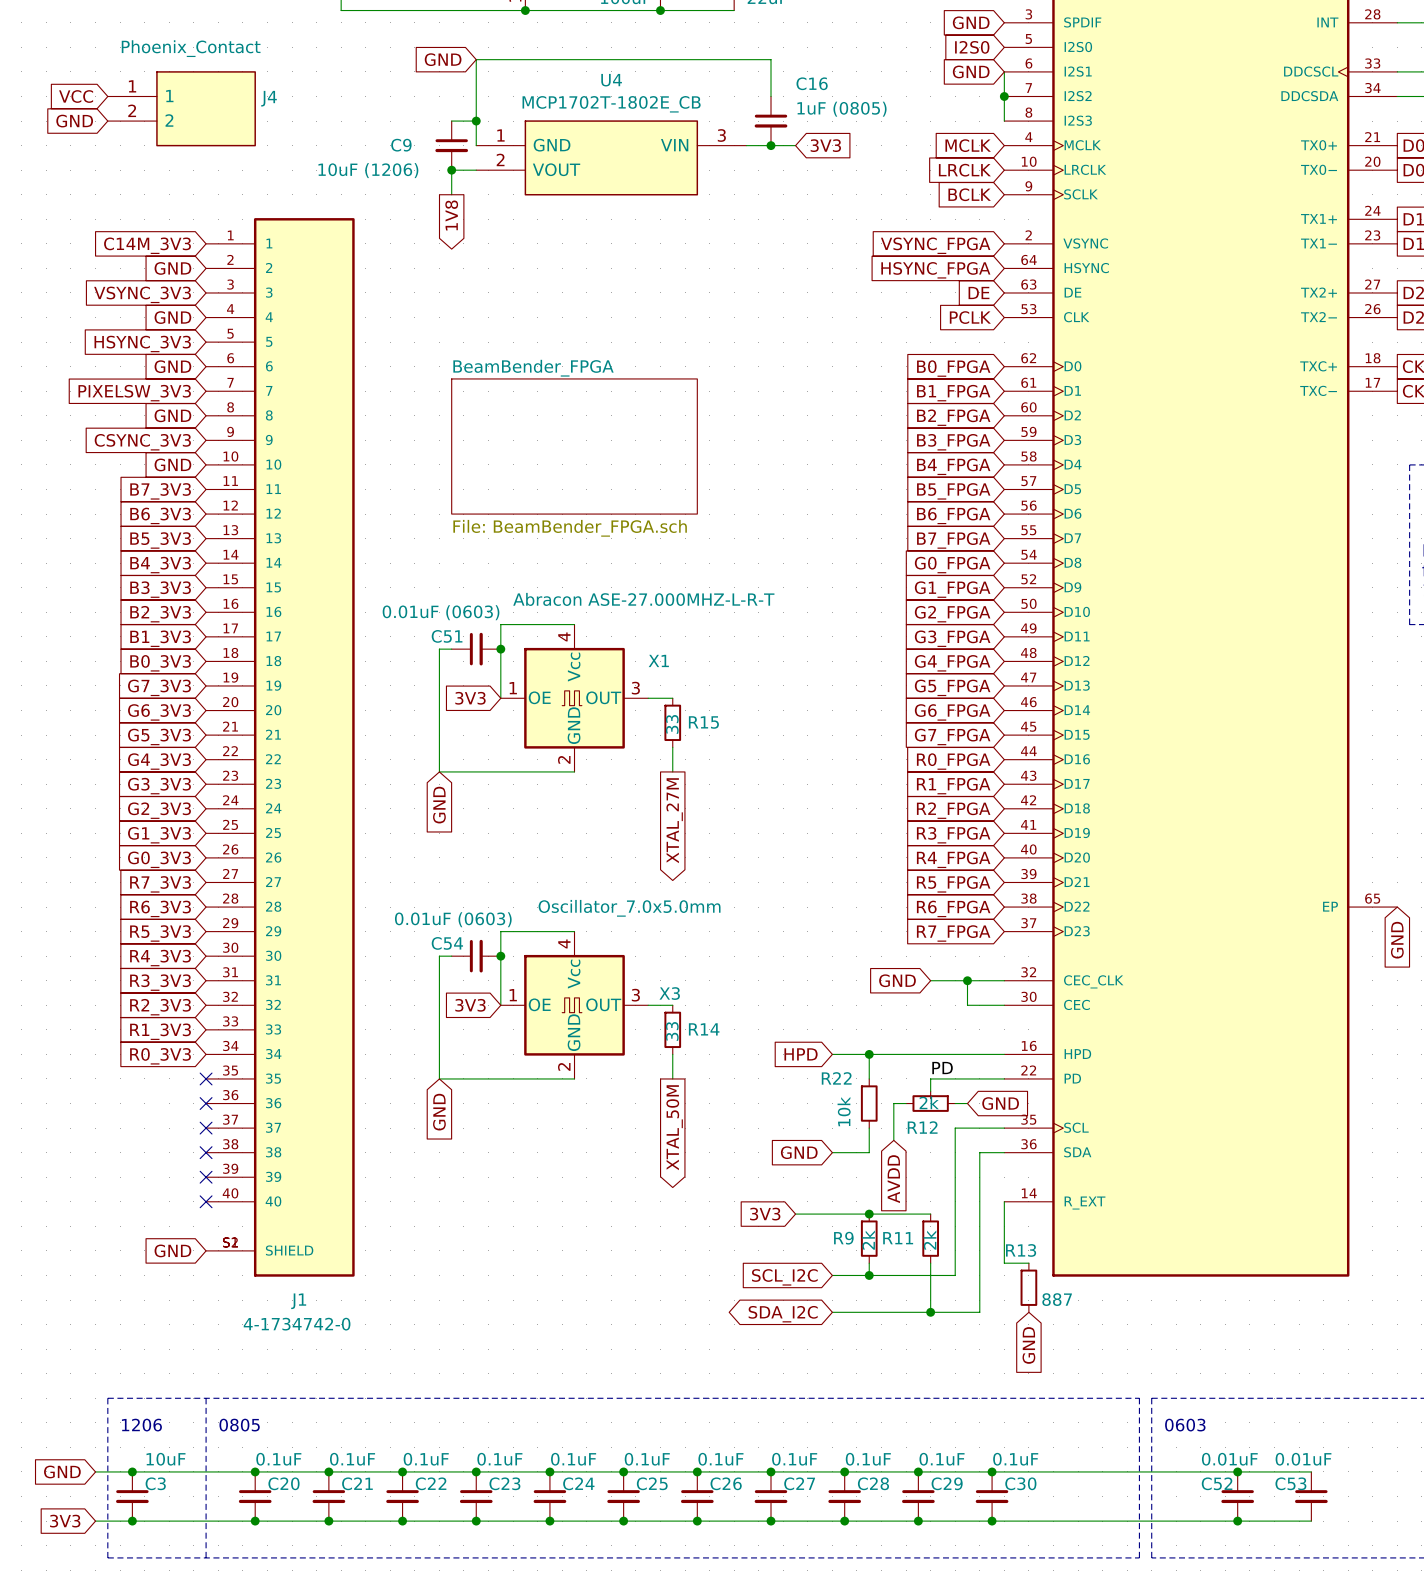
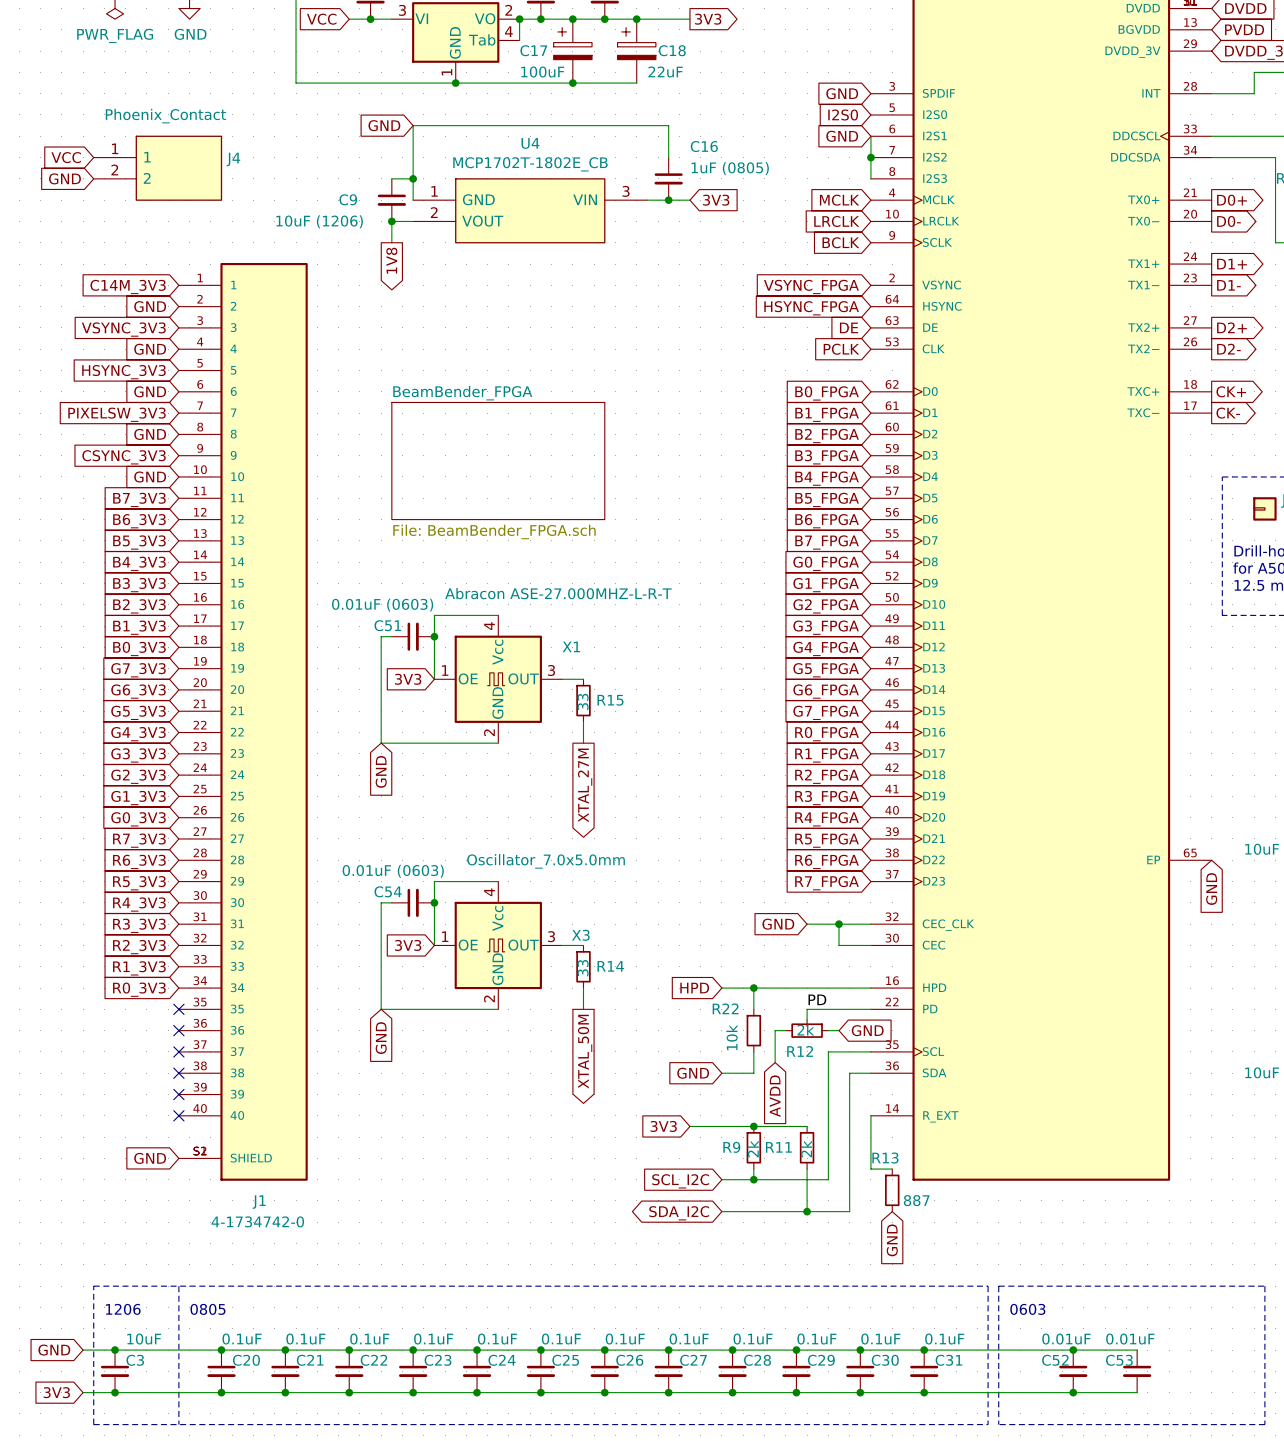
junction: none -> (924, 1350)
C31: none -> 0.1uF (924, 1371)
junction: none -> (924, 1392)

